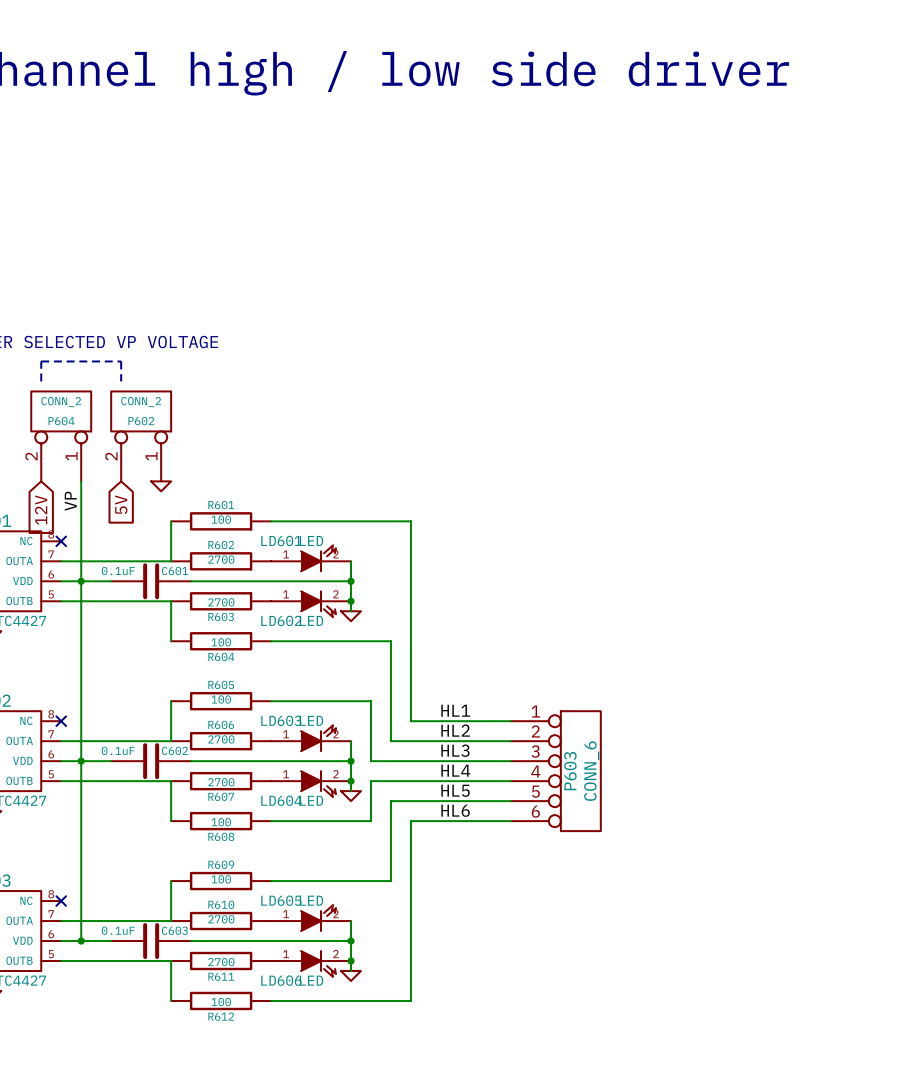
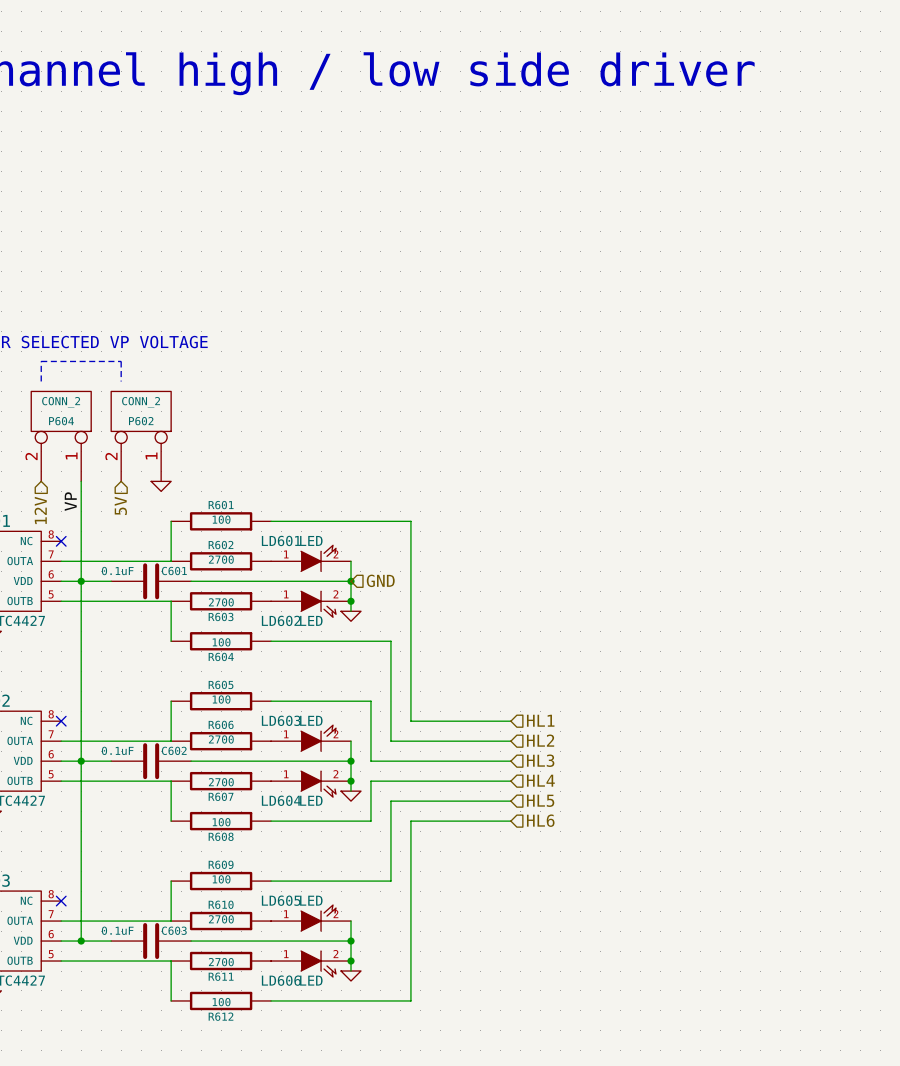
global label: 5V (121, 504) -> none
hierarchical label: none -> 5V (120, 505)
global label: 12V (41, 510) -> none
hierarchical label: none -> 12V (40, 510)
hierarchical label: none -> GND (380, 580)
label: HL1 (455, 710) -> none
hierarchical label: none -> HL1 (540, 720)
label: HL2 (455, 730) -> none
hierarchical label: none -> HL2 (540, 740)
label: HL3 (455, 750) -> none
hierarchical label: none -> HL3 (540, 760)
label: HL4 (455, 770) -> none
P603: CONN_6 (555, 771) -> none
hierarchical label: none -> HL4 (540, 780)
label: HL5 (455, 790) -> none
hierarchical label: none -> HL5 (540, 800)
label: HL6 (455, 810) -> none
hierarchical label: none -> HL6 (540, 820)

